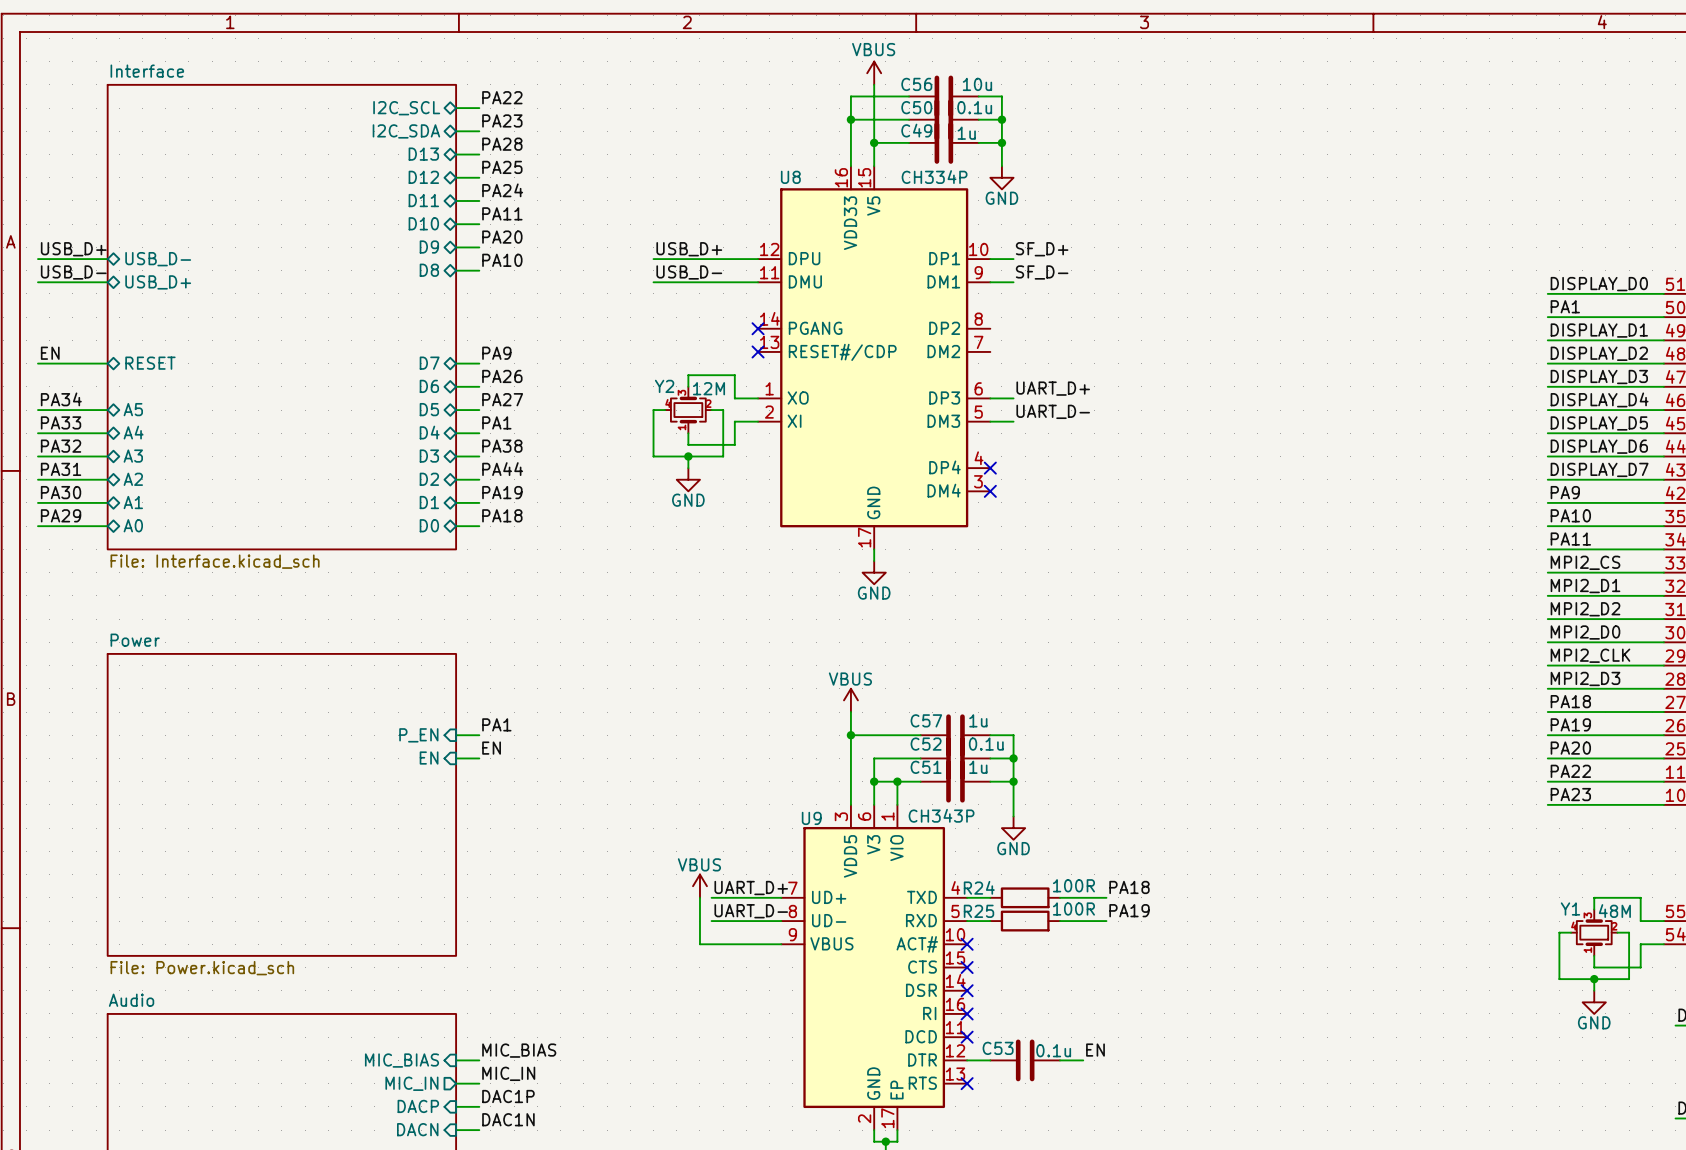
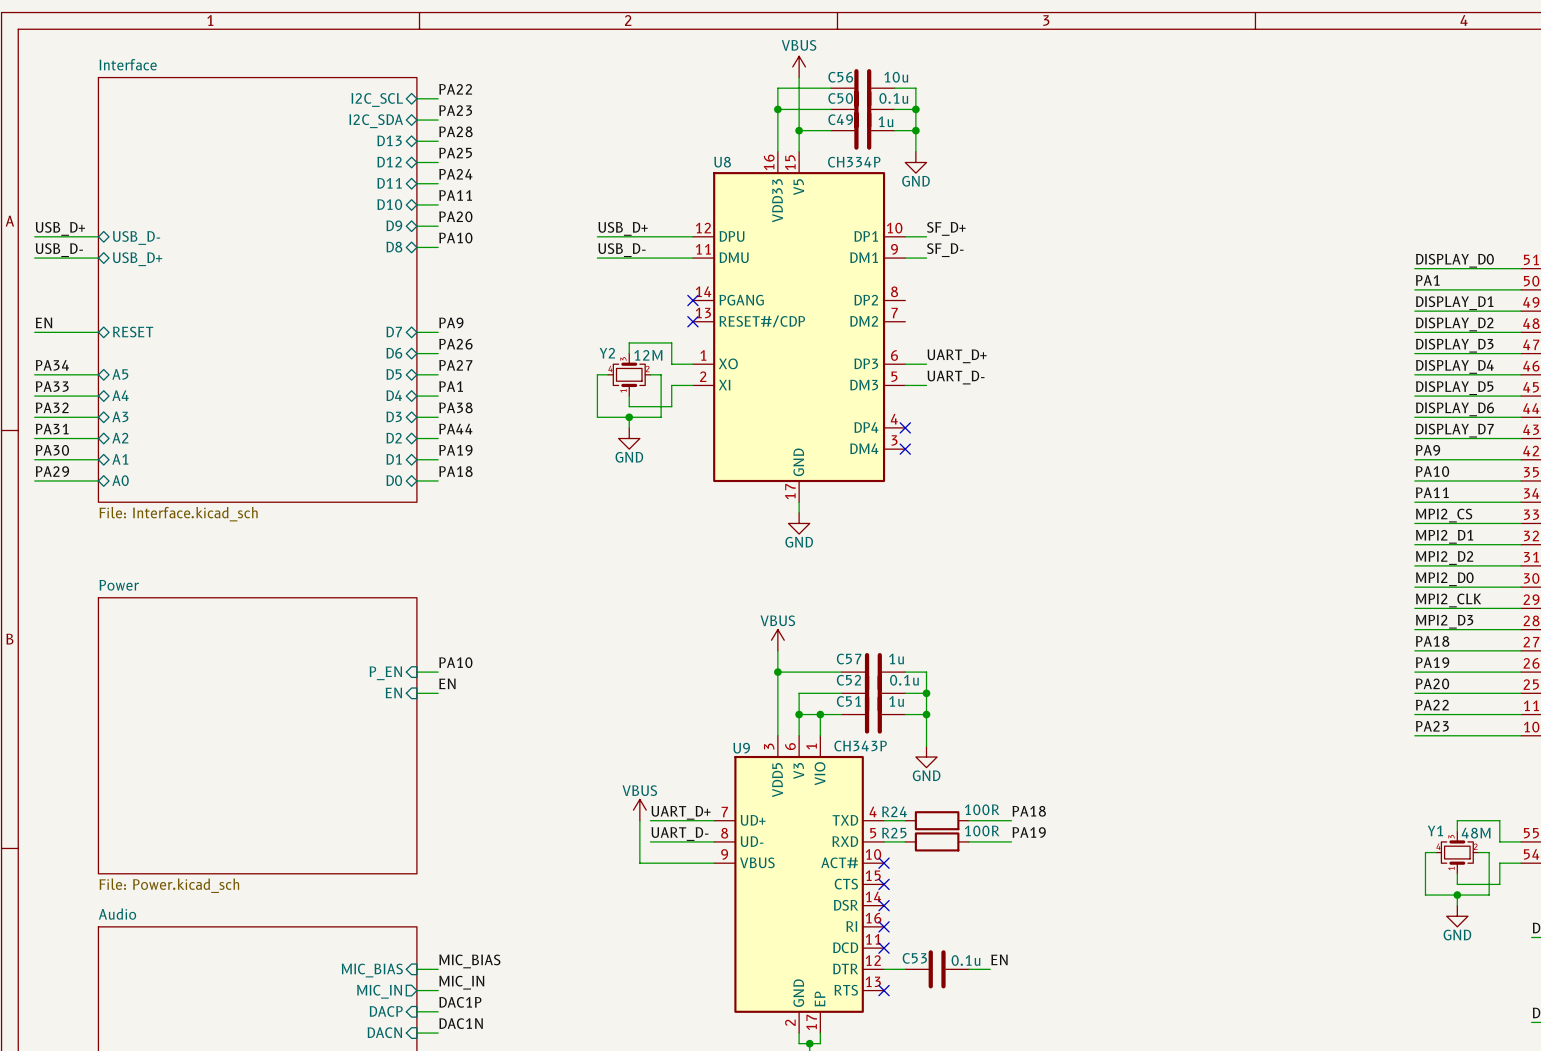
label: PA1 (496, 724) -> PA10 (455, 662)

